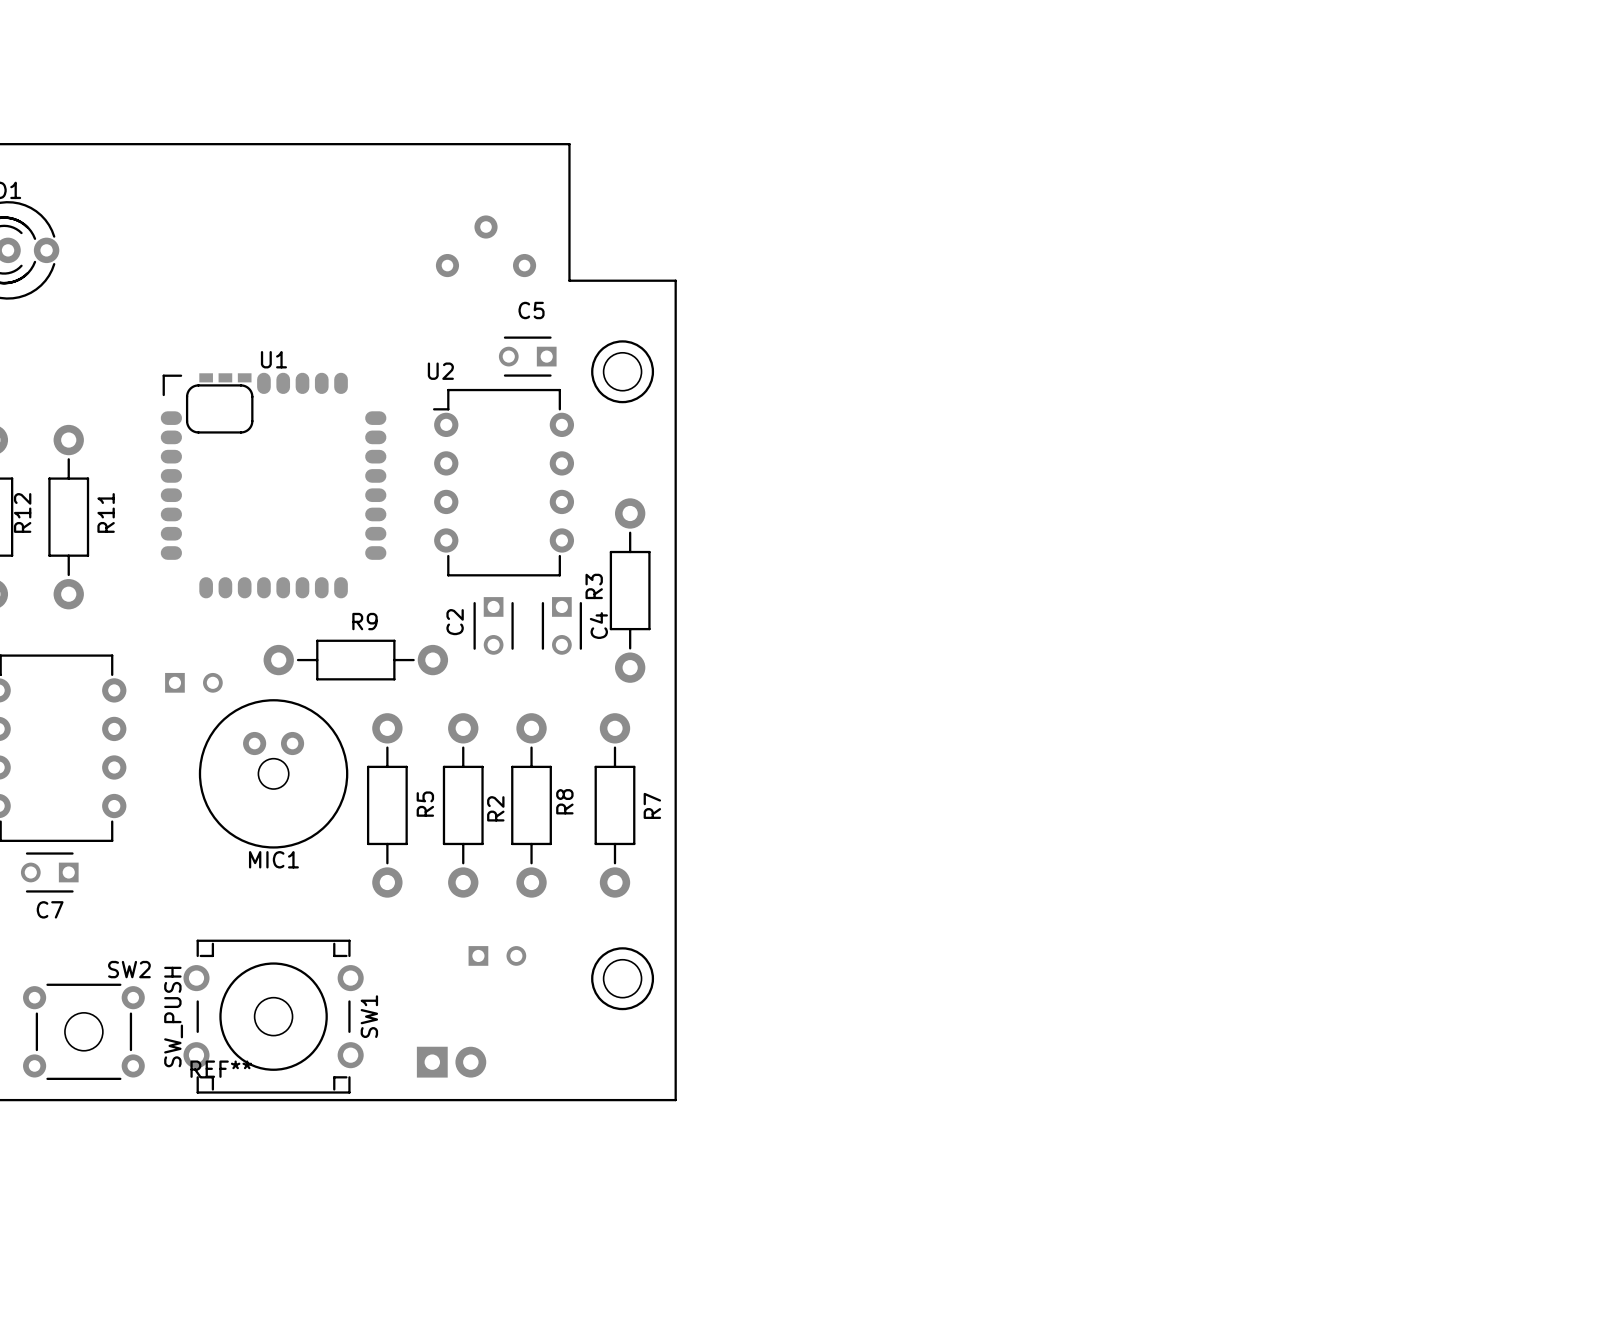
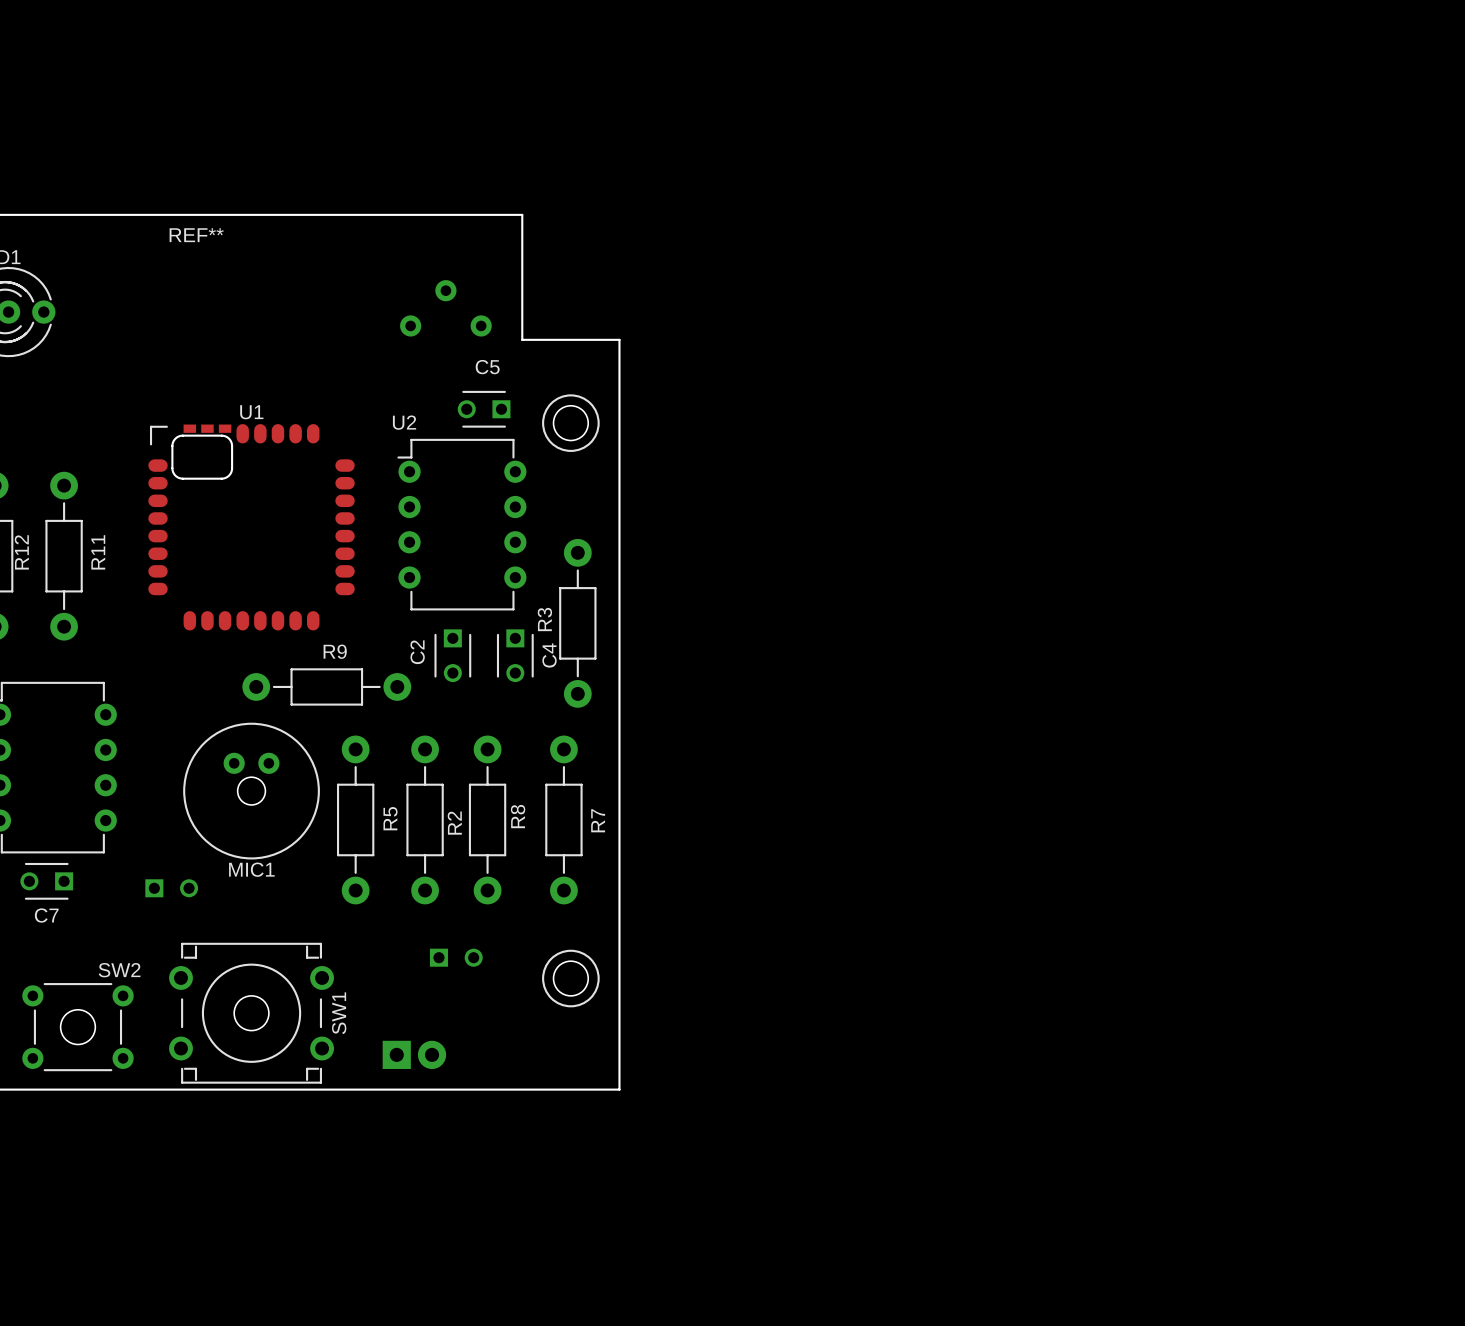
part position: (193, 682) -> (171, 888)
SW1 value: SW_PUSH (173, 1017) -> none
REF** name position: REF** (221, 1069) -> REF** (196, 235)

